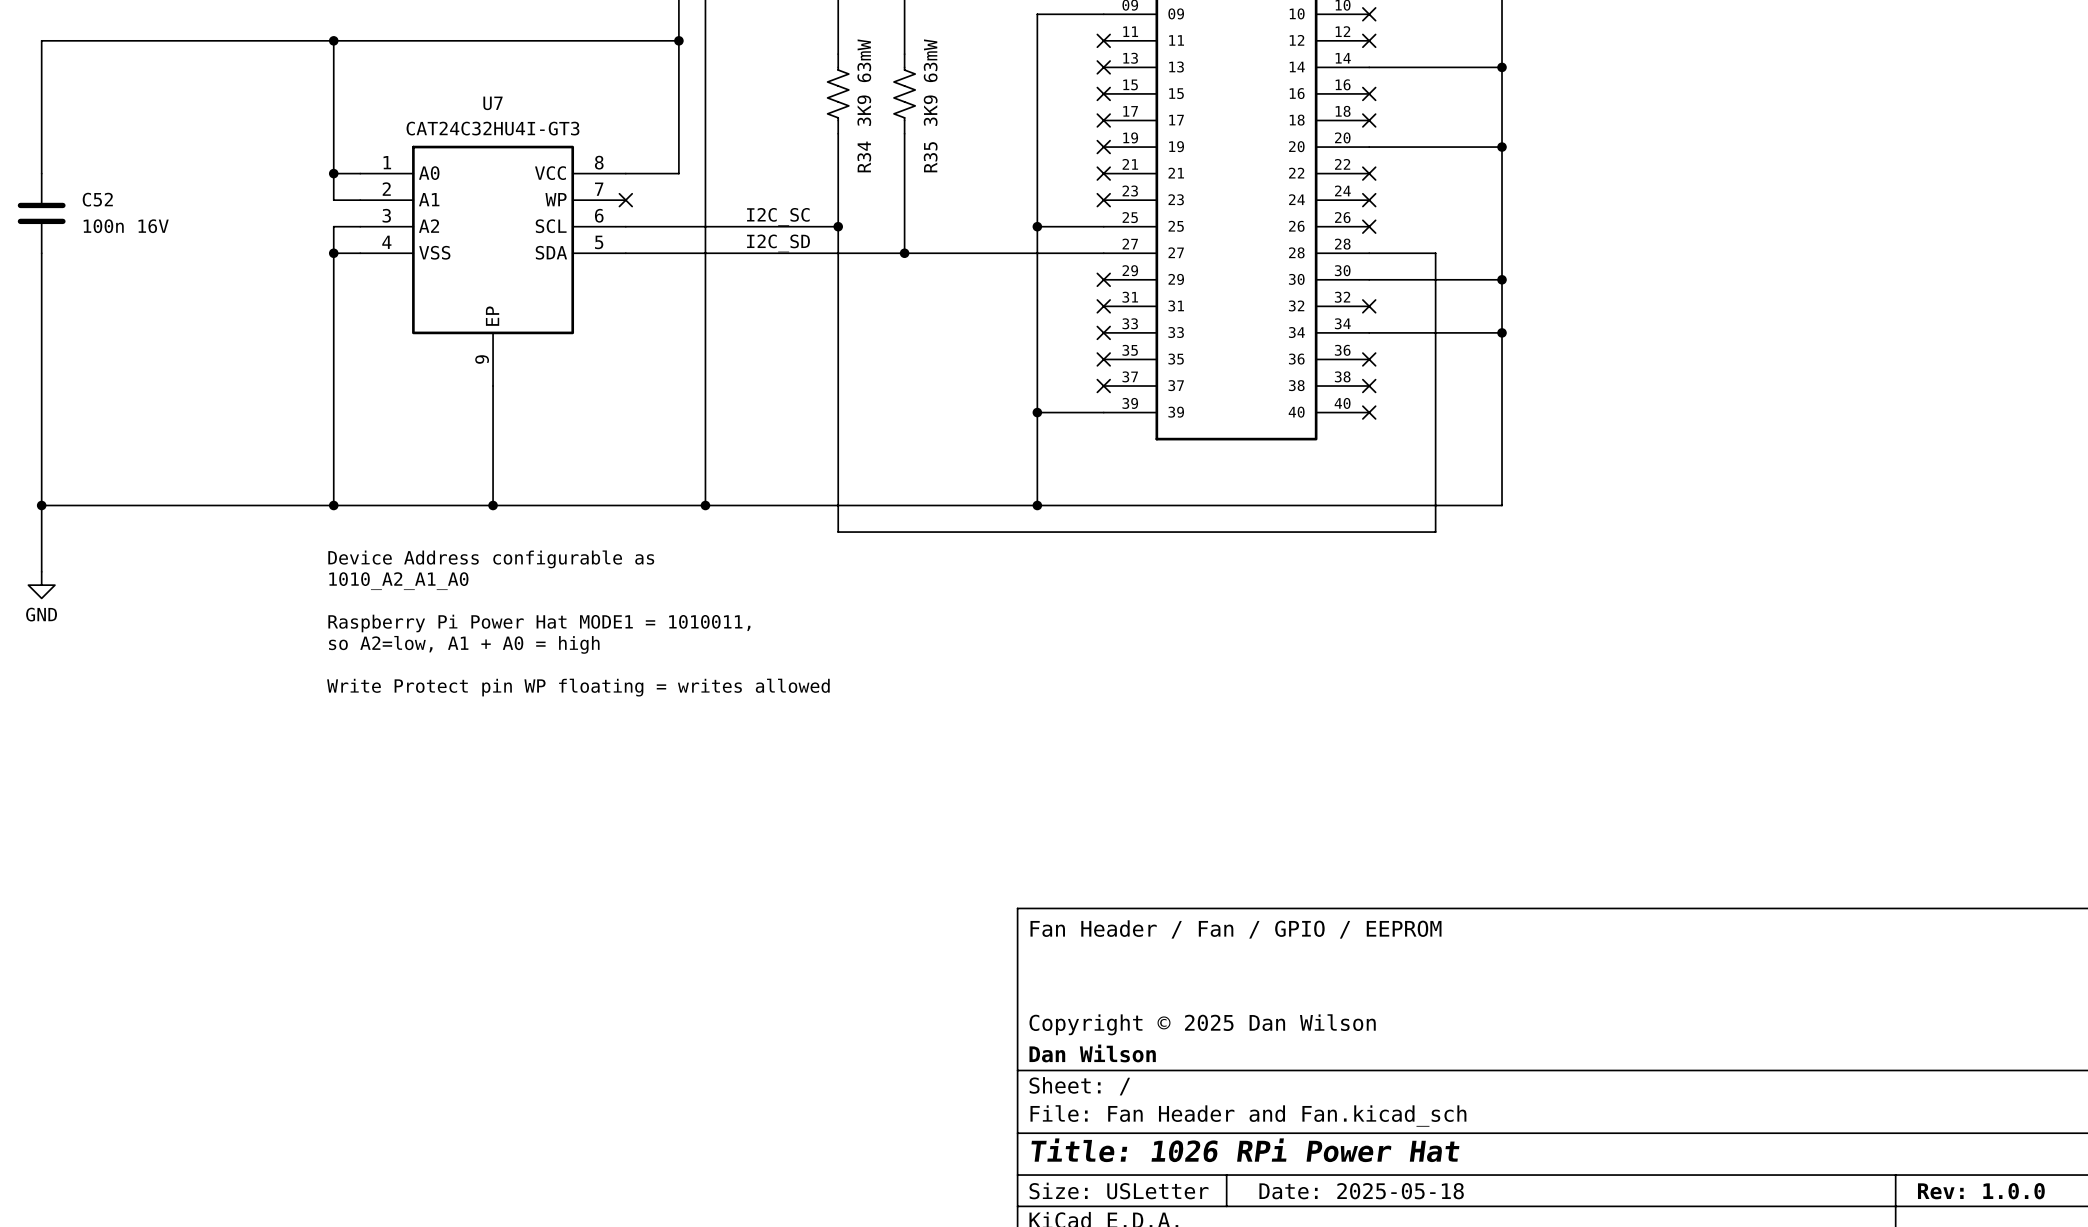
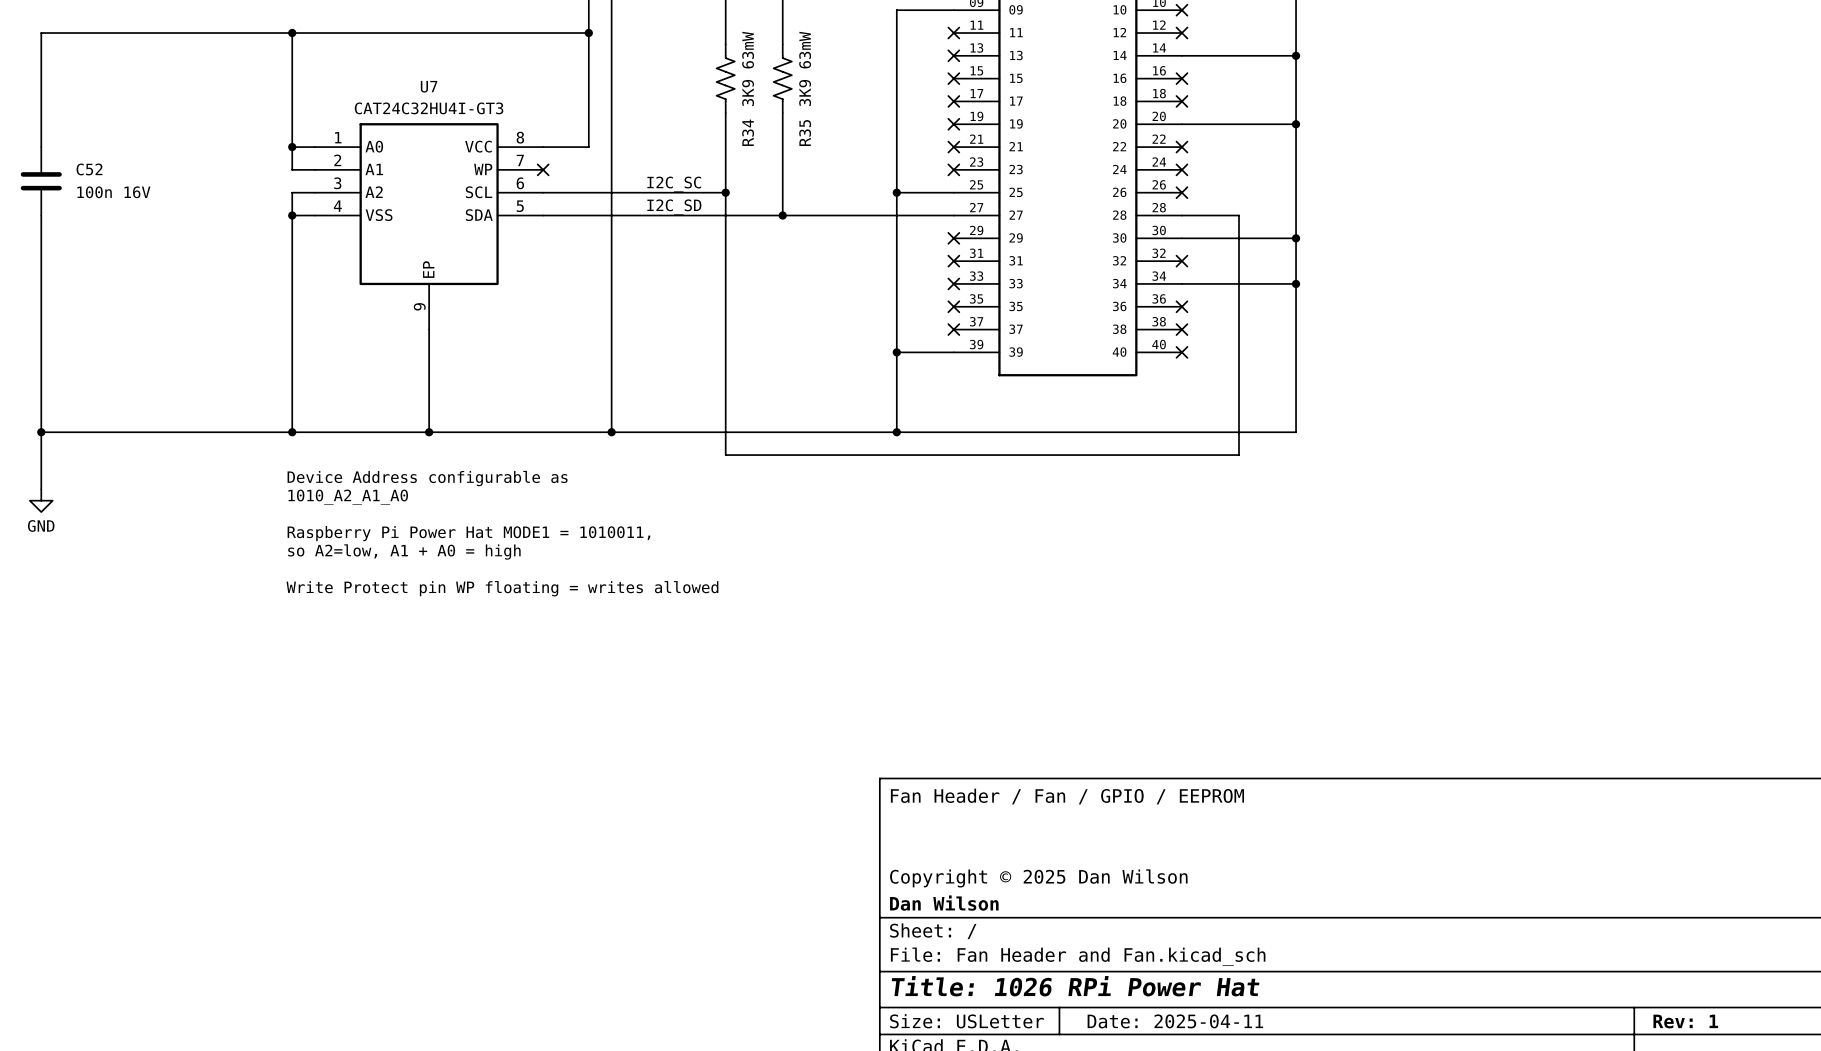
title block: Date: 2025-05-18 (1361, 1191) -> Date: 2025-04-11 (1175, 1021)
title block: Rev: 1.0.0 (1981, 1191) -> Rev: 1 (1685, 1021)

